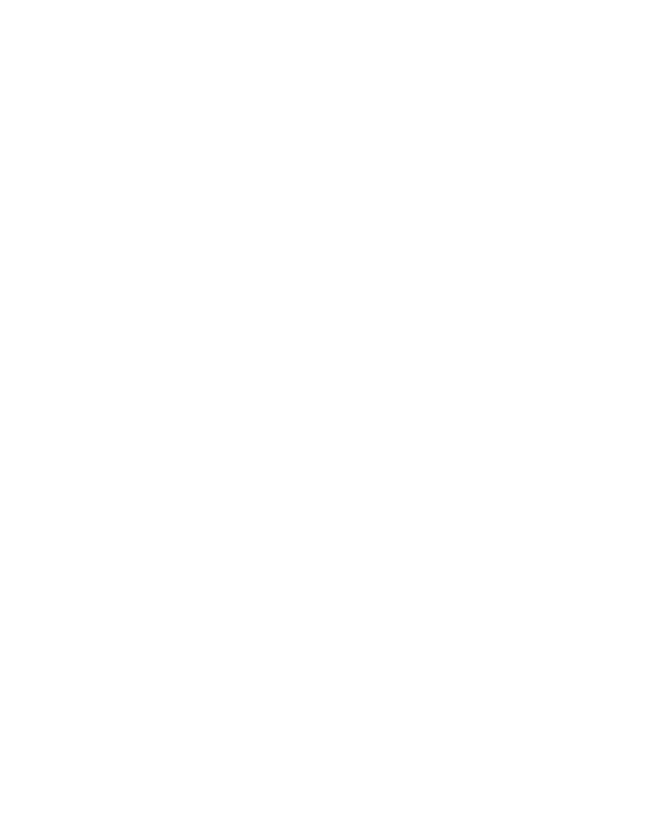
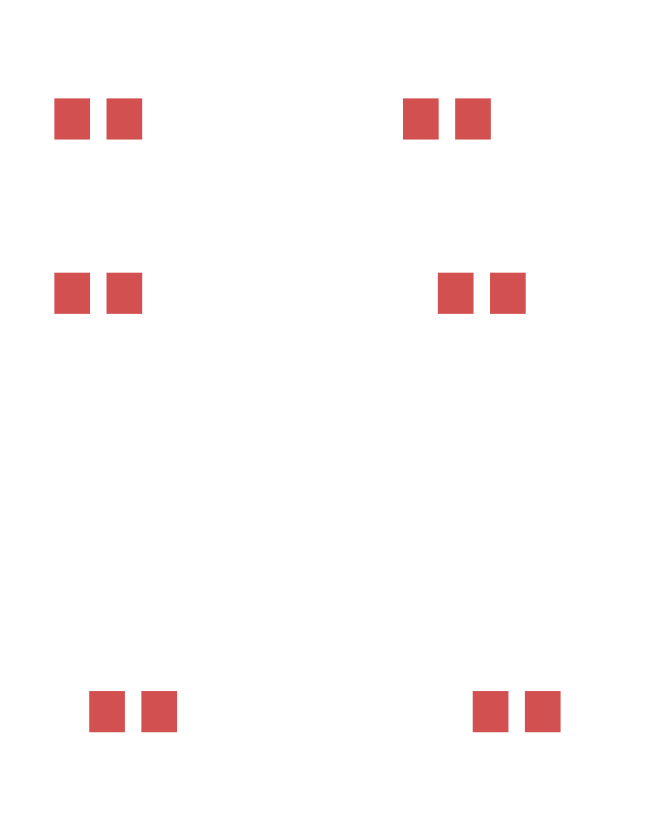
part: none -> (98, 118)
part: none -> (446, 118)
part: none -> (98, 293)
part: none -> (481, 293)
part: none -> (133, 711)
part: none -> (516, 711)

